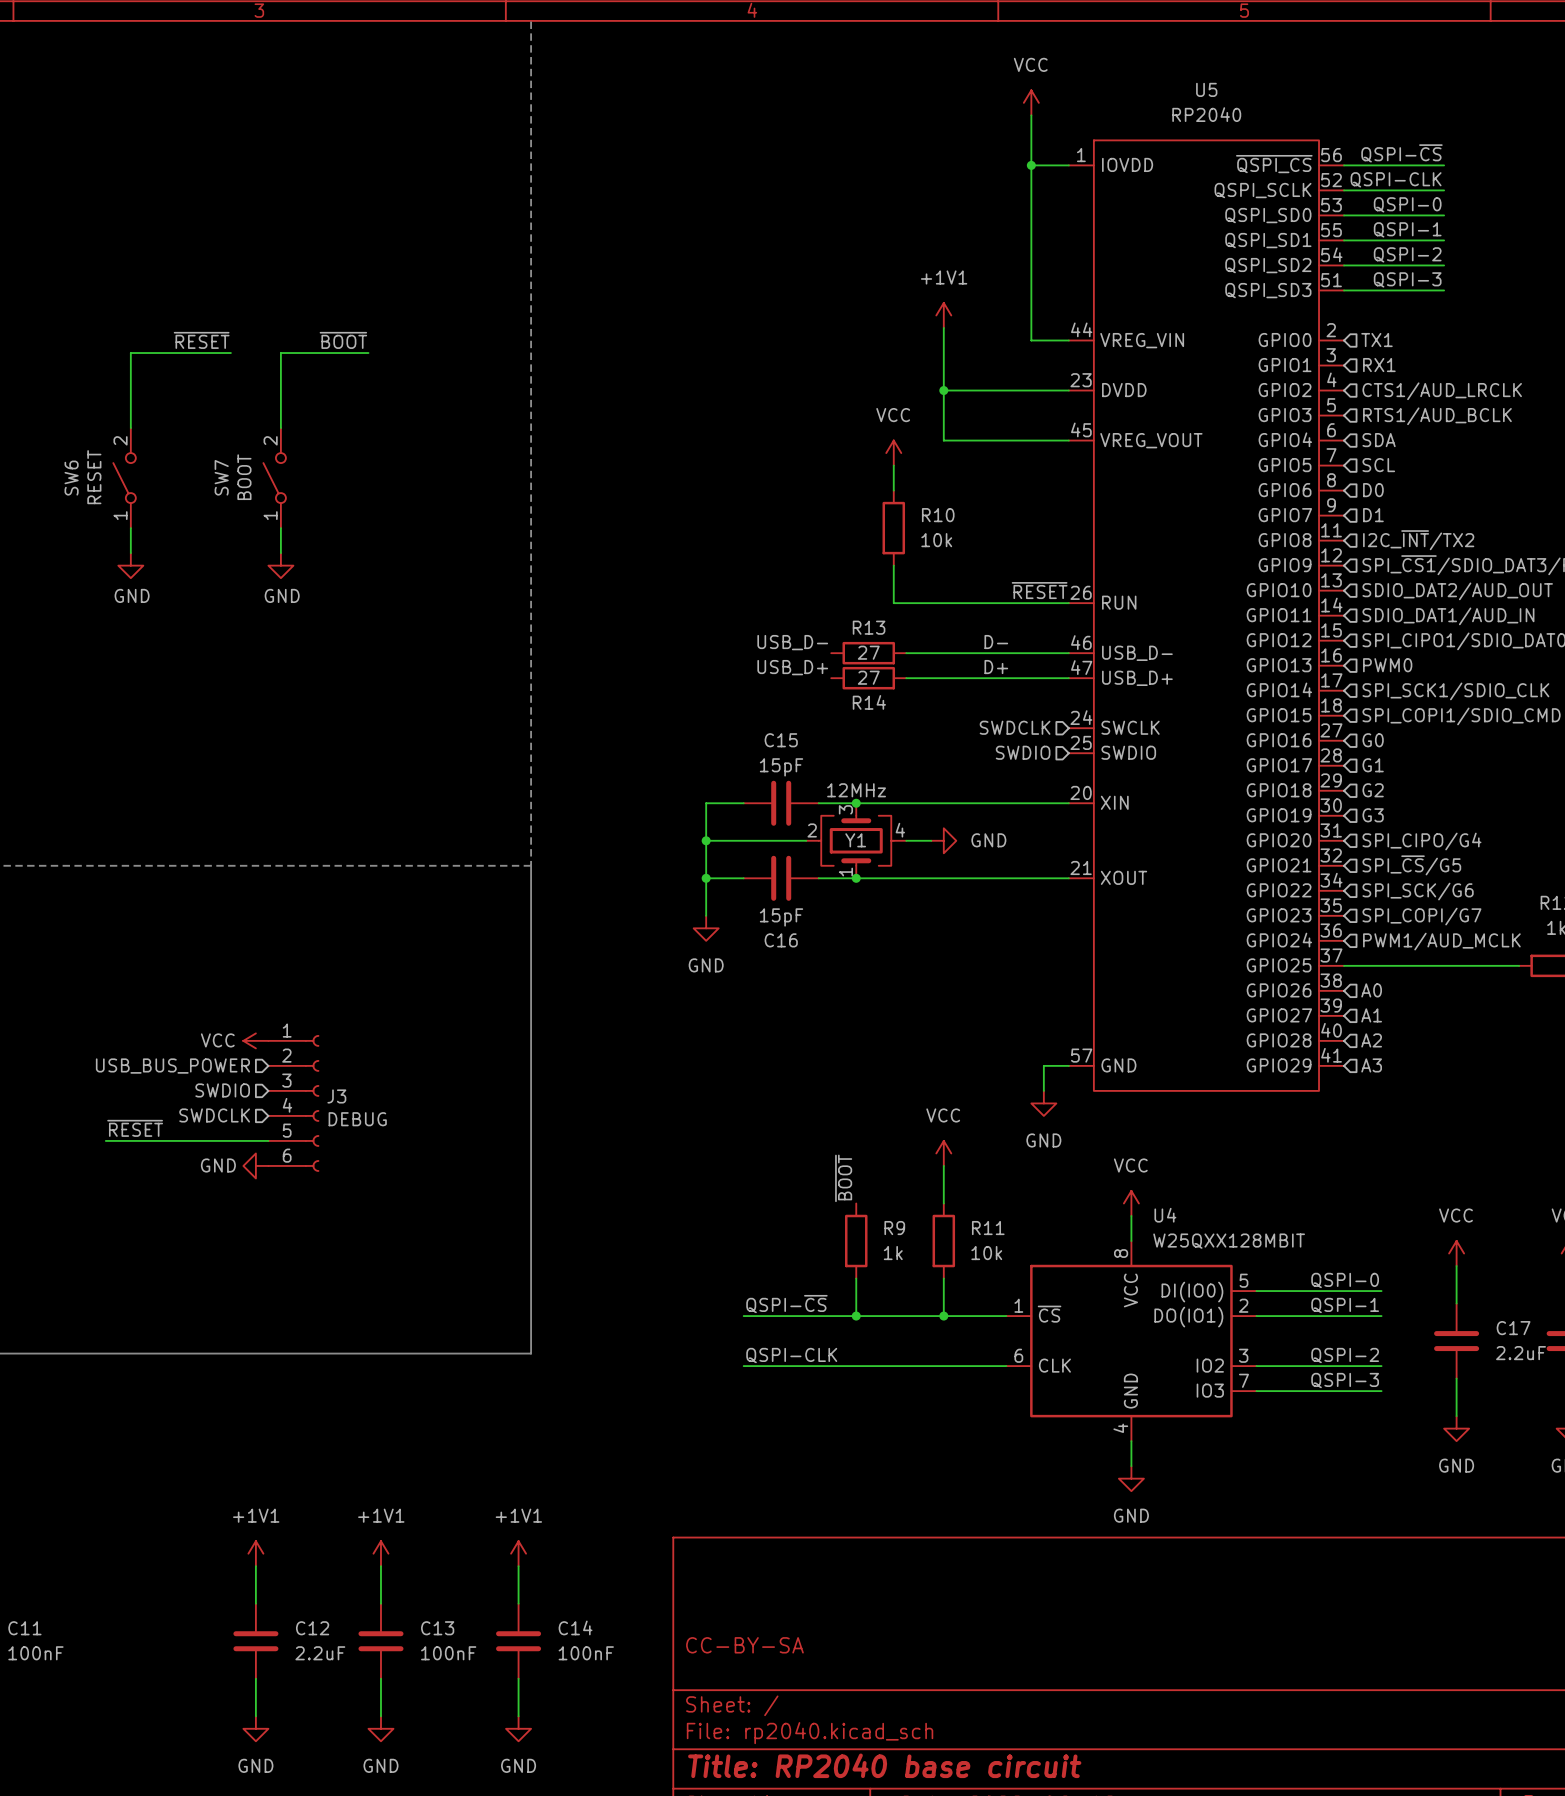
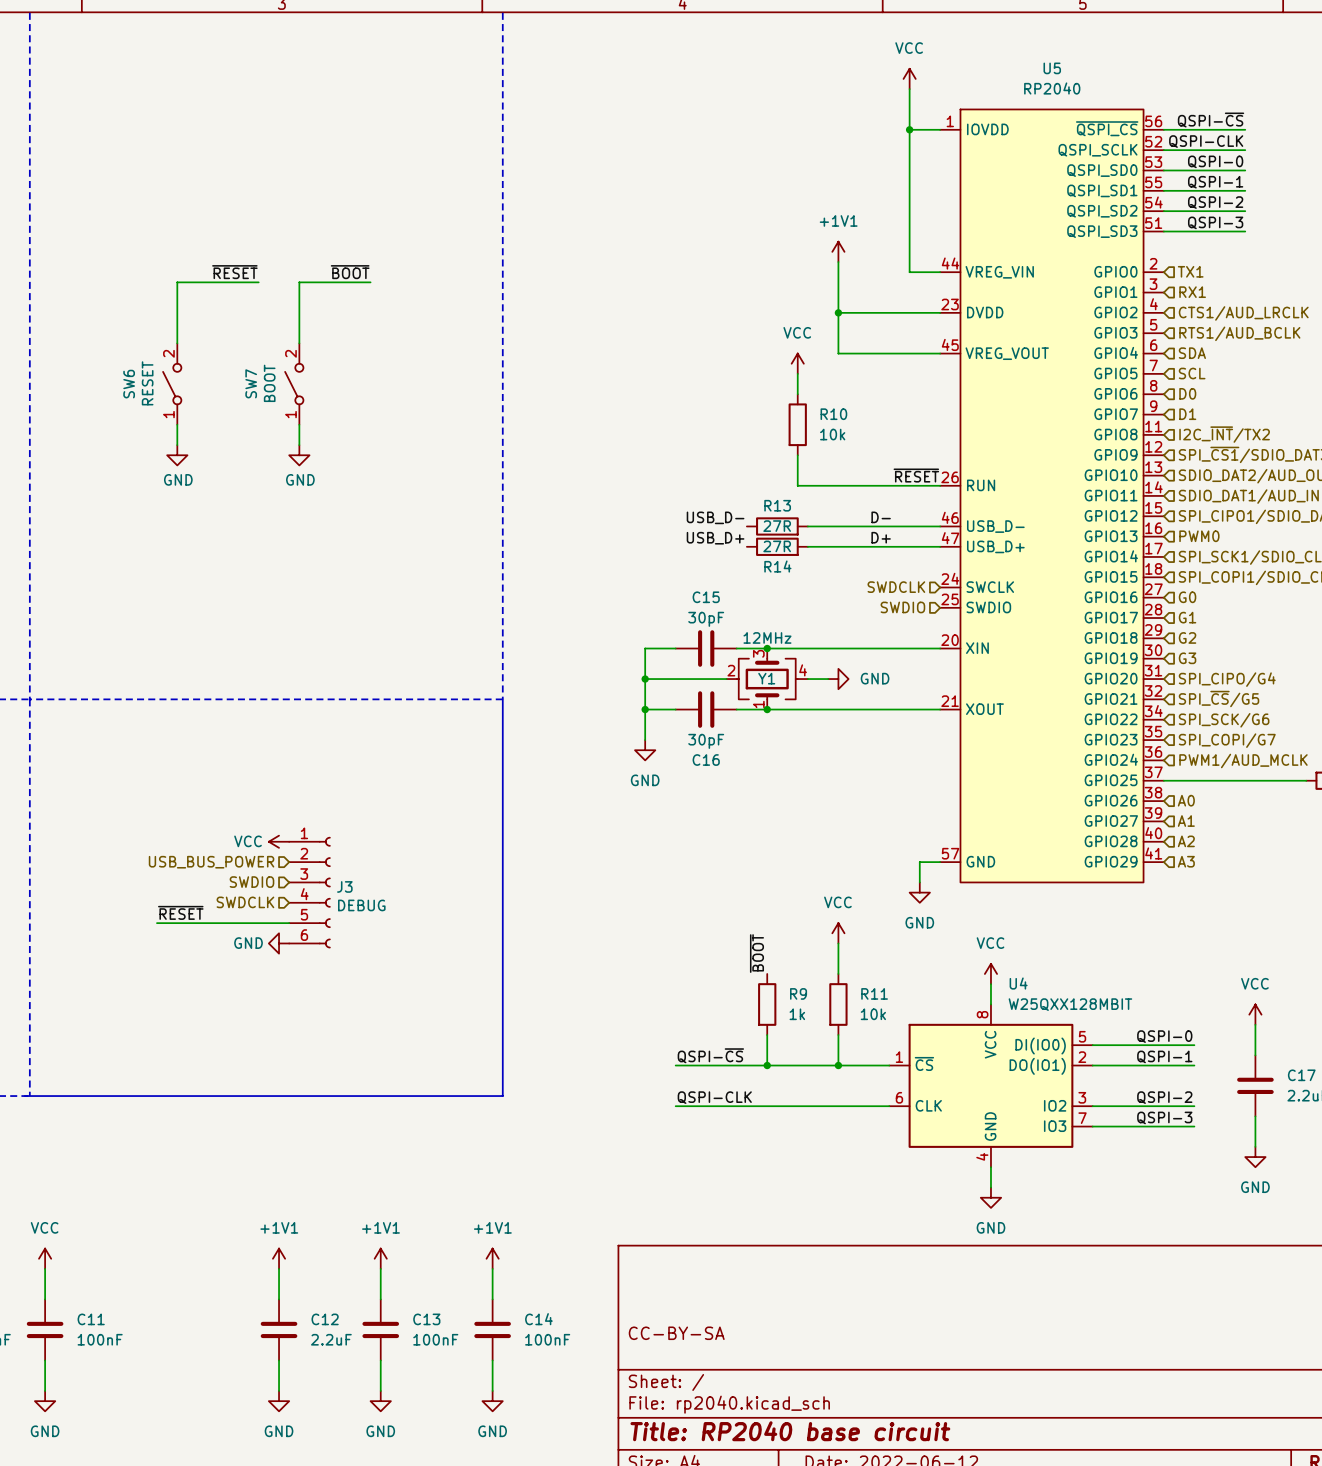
R13 value: 27 (868, 652) -> 27R (777, 526)
R14 value: 27 (868, 677) -> 27R (777, 546)
C15 value: 15pF (781, 767) -> 30pF (706, 619)
C16 value: 15pF (781, 917) -> 30pF (706, 741)

